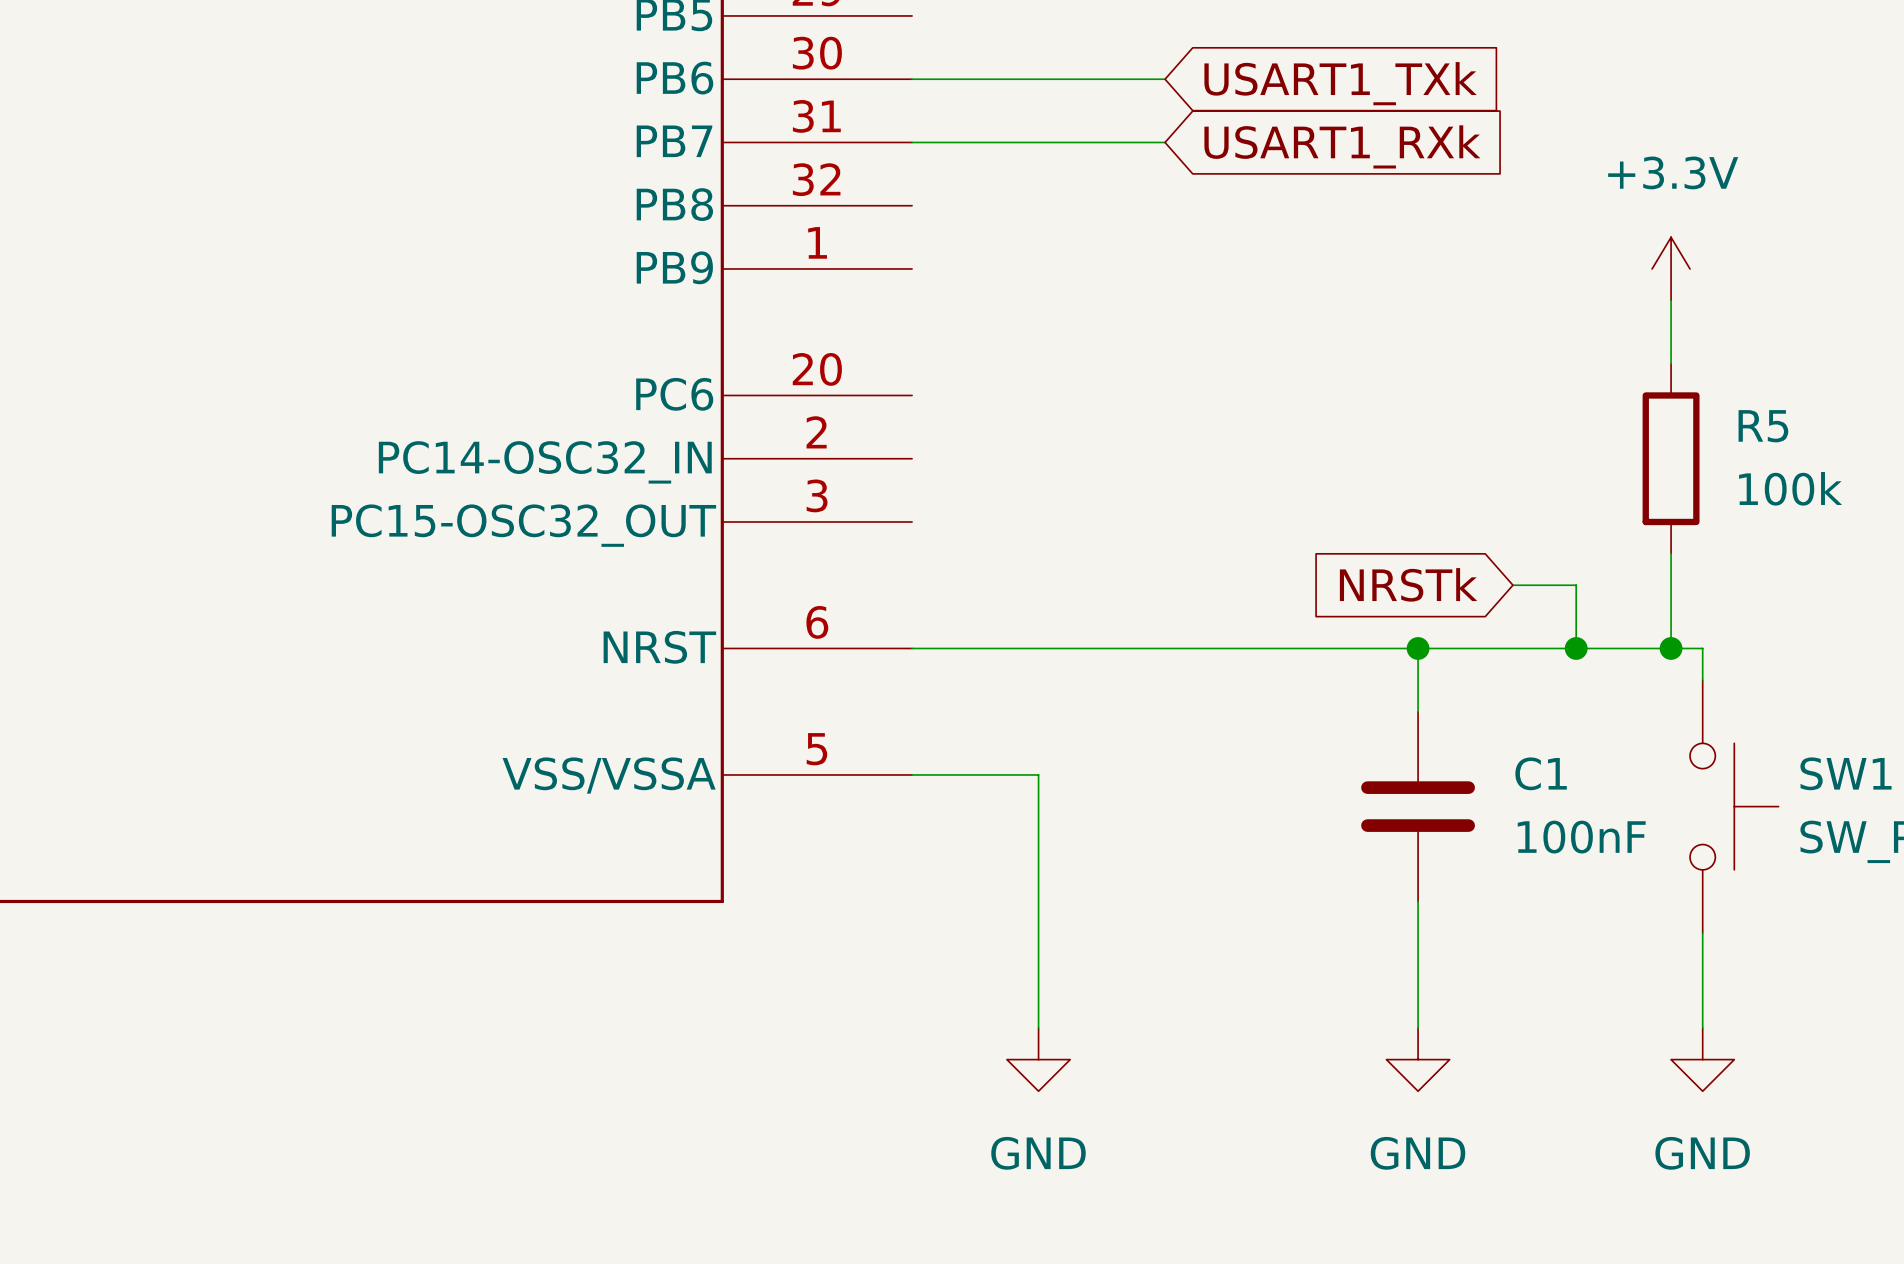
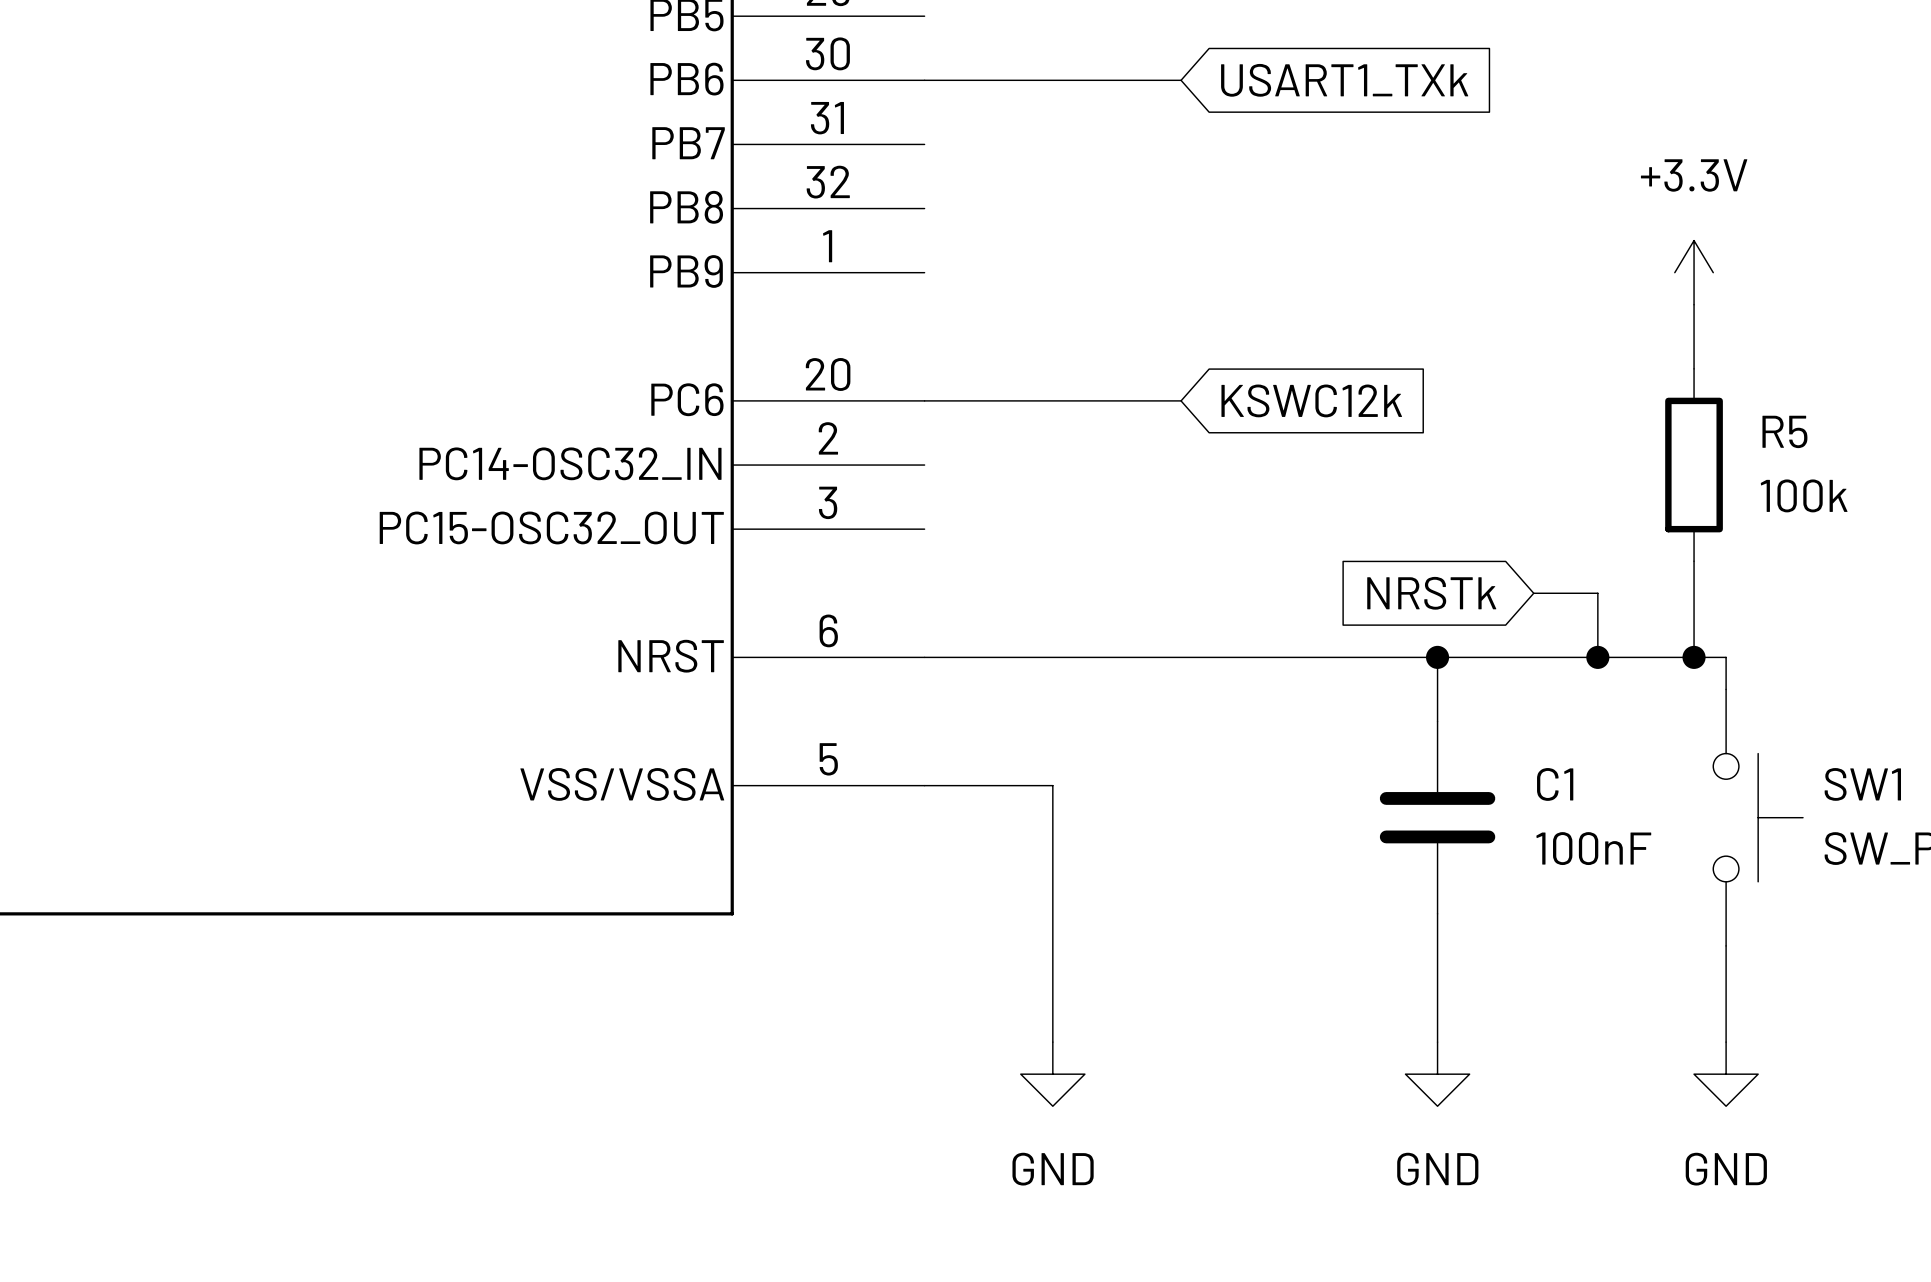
wire: (912, 142) (1165, 142) -> (924, 400) (1181, 400)
global label: USART1_RXk (1342, 146) -> none
global label: none -> KSWC12k (1311, 400)

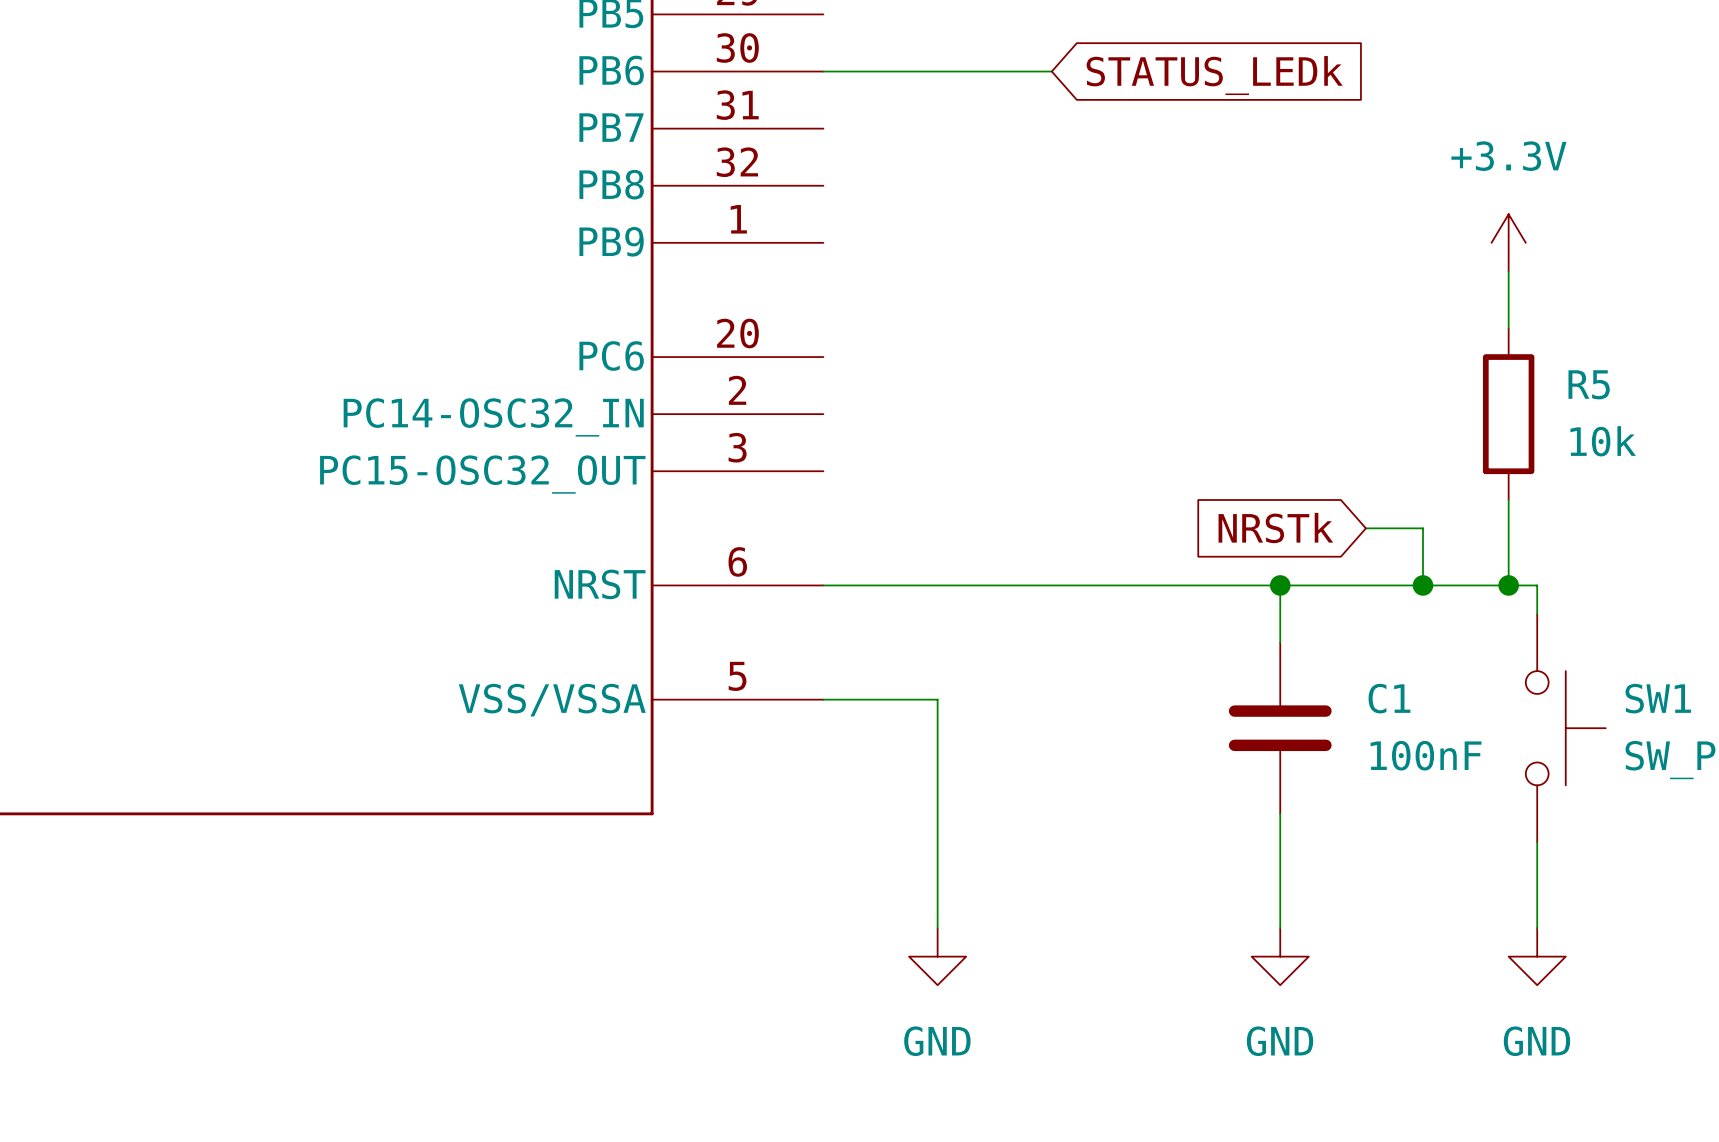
global label: USART1_TXk (1344, 80) -> STATUS_LEDk (1214, 75)
wire: (924, 400) (1181, 400) -> none
global label: KSWC12k (1311, 400) -> none
R5 value: 100k (1804, 495) -> 10k (1603, 441)

